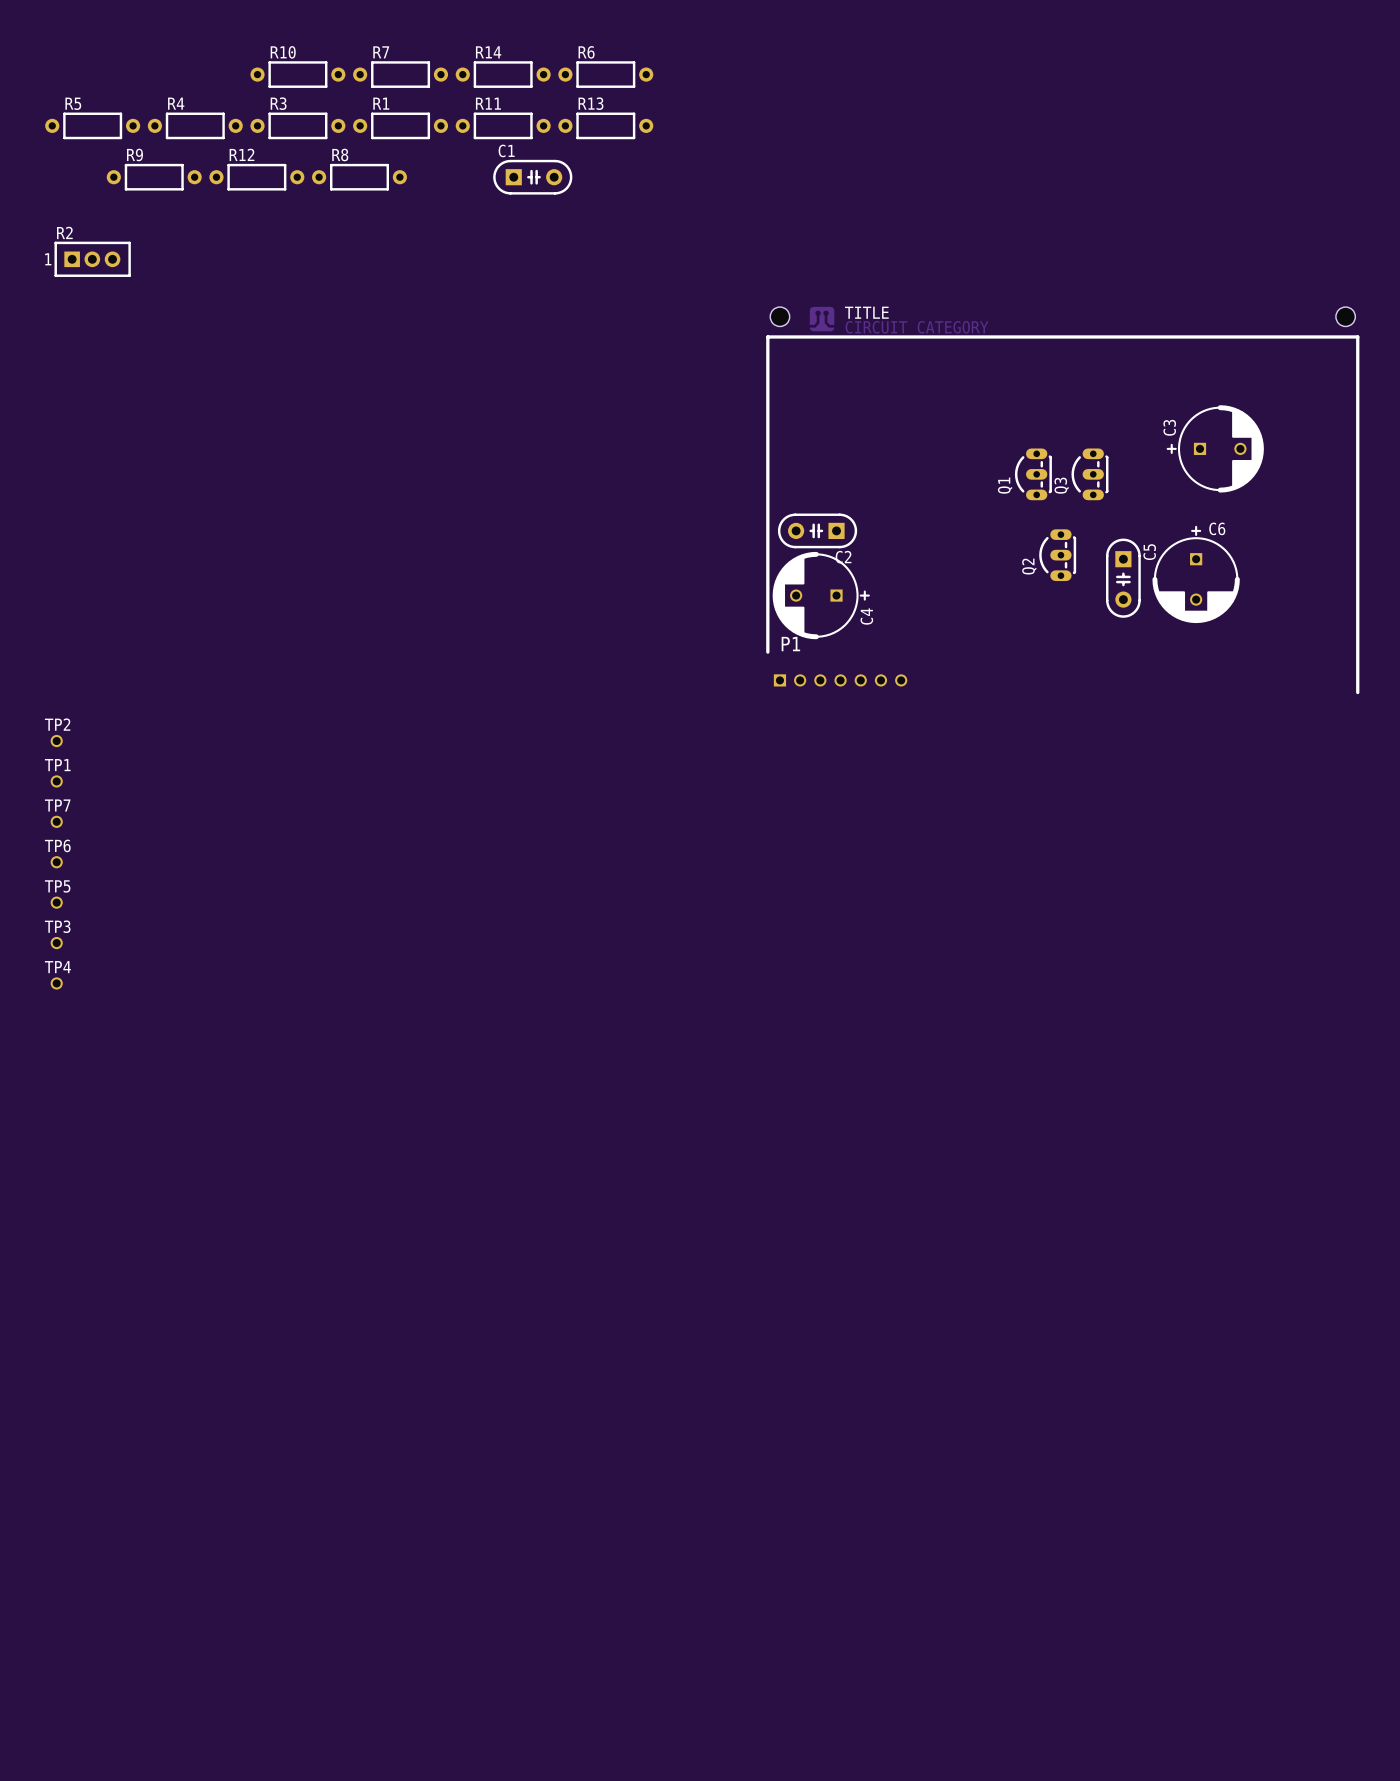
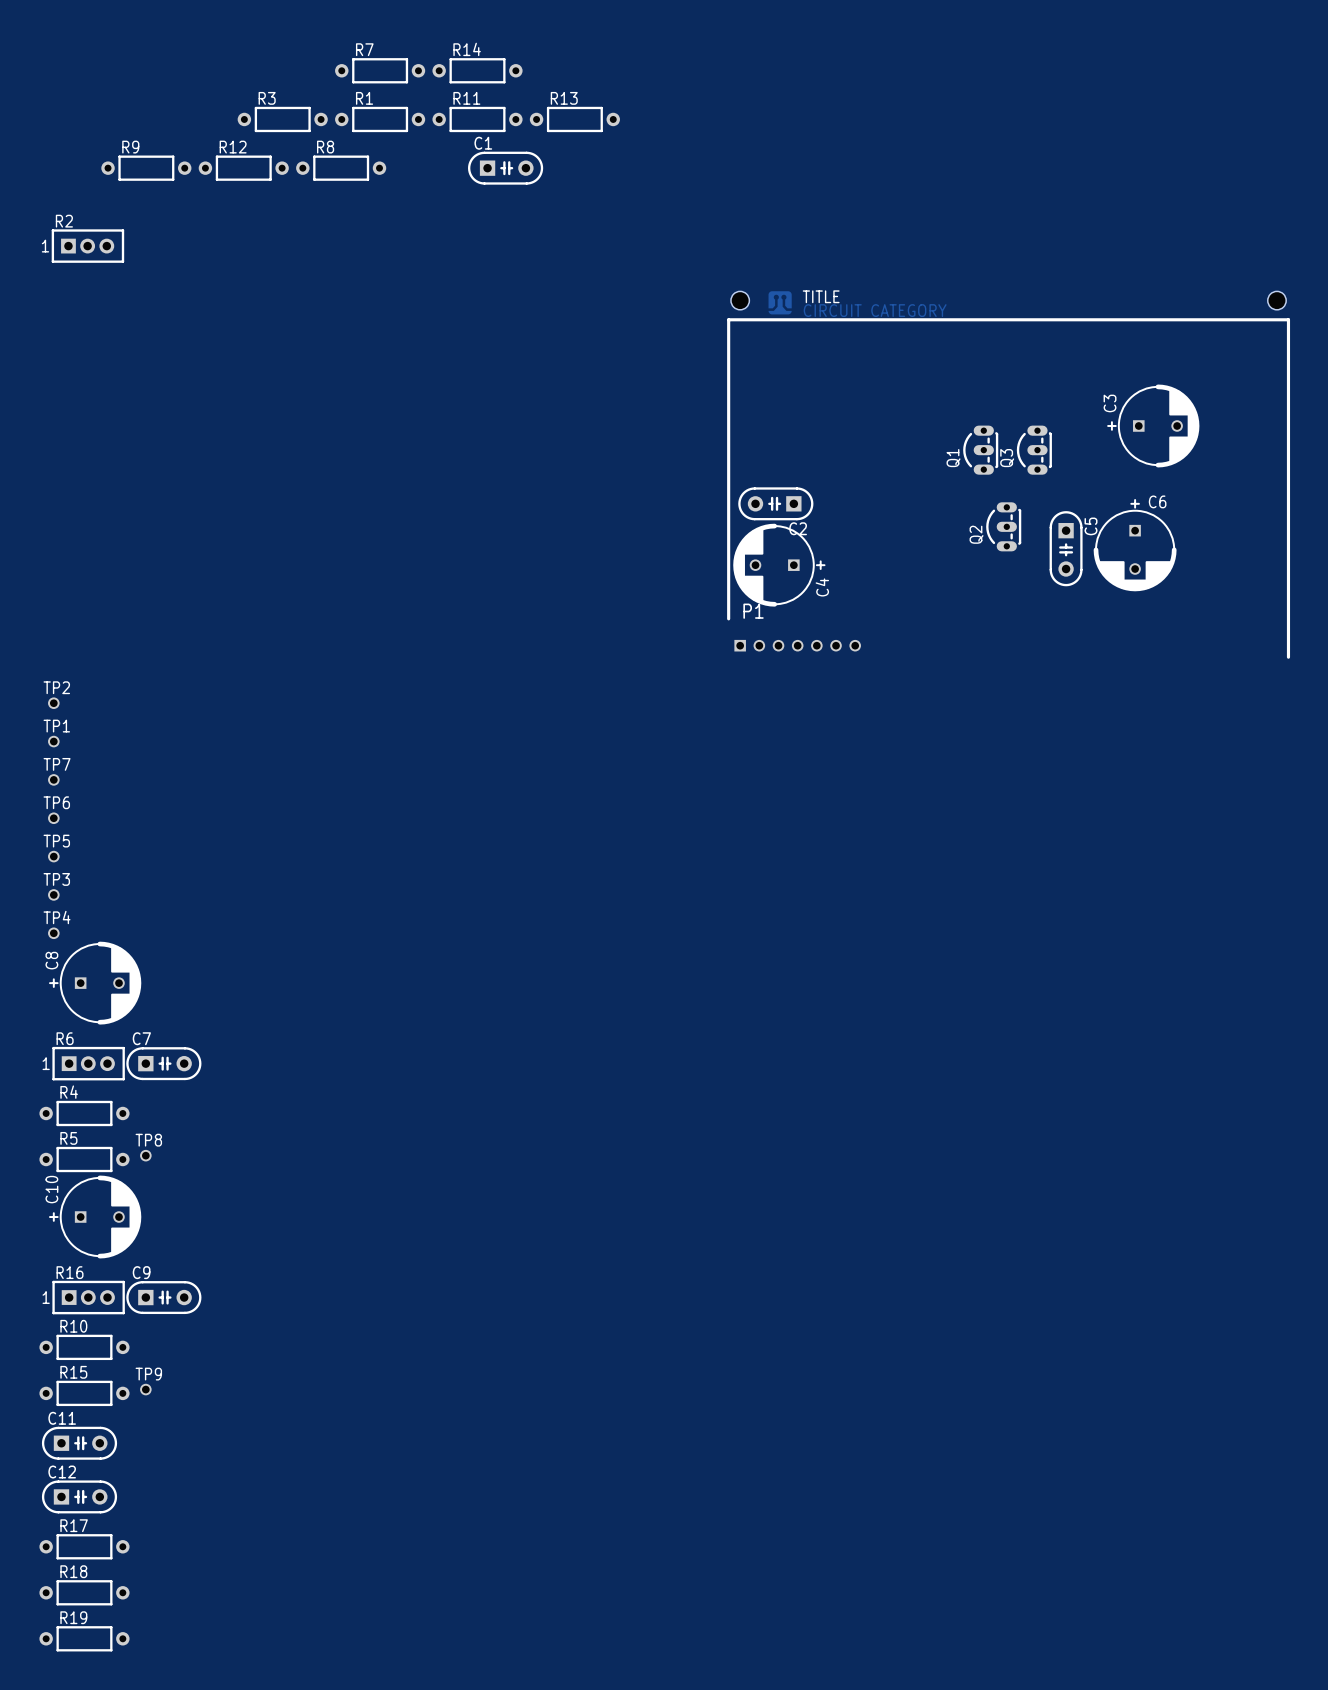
R6 footprint: [558, 61, 654, 88] -> [52, 1046, 125, 1081]
R10 position: (297, 74) -> (84, 1347)
R5 position: (92, 125) -> (84, 1159)
R4 position: (195, 125) -> (84, 1113)
C8: none -> (95, 983)
C7: none -> (163, 1063)
TP8: none -> (145, 1155)
C10: none -> (95, 1217)
R16: none -> (88, 1297)
C9: none -> (163, 1297)
TP9: none -> (145, 1389)
R15: none -> (84, 1393)
C11: none -> (79, 1443)
C12: none -> (79, 1496)
R17: none -> (84, 1546)
R18: none -> (84, 1592)
R19: none -> (84, 1638)

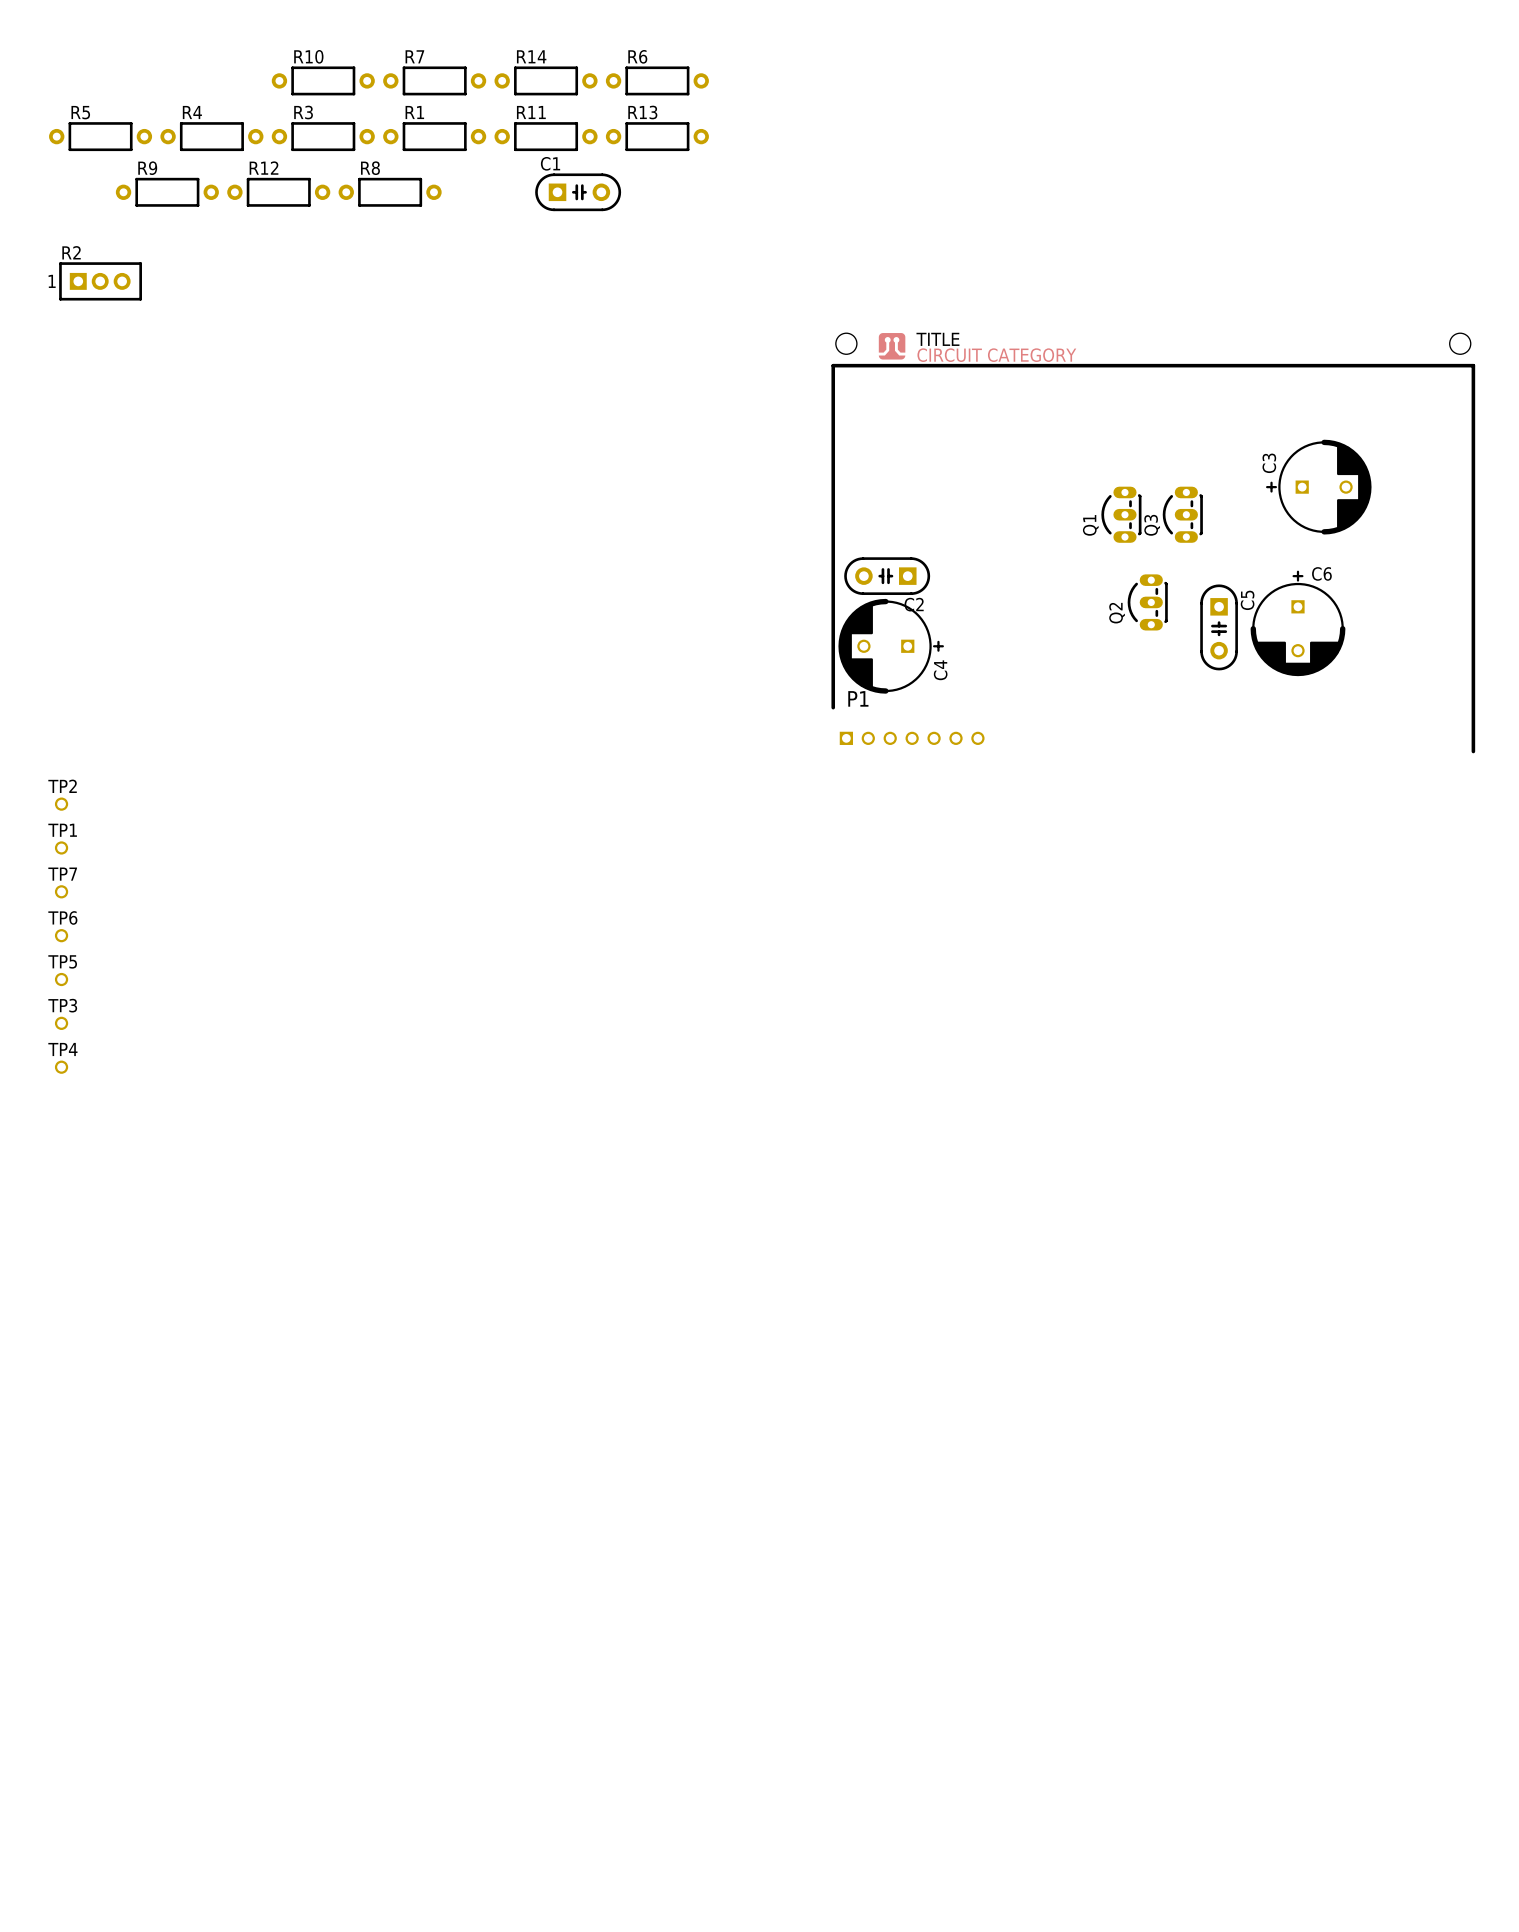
C8: (95, 983) -> none
R6 footprint: [52, 1046, 125, 1081] -> [605, 66, 709, 96]
C7: (163, 1063) -> none
R4 position: (84, 1113) -> (211, 136)
TP8: (145, 1155) -> none
R5 position: (84, 1159) -> (100, 136)
C10: (95, 1217) -> none
R16: (88, 1297) -> none
C9: (163, 1297) -> none
R10 position: (84, 1347) -> (323, 80)
TP9: (145, 1389) -> none
R15: (84, 1393) -> none
C11: (79, 1443) -> none
C12: (79, 1496) -> none
R17: (84, 1546) -> none
R18: (84, 1592) -> none
R19: (84, 1638) -> none

